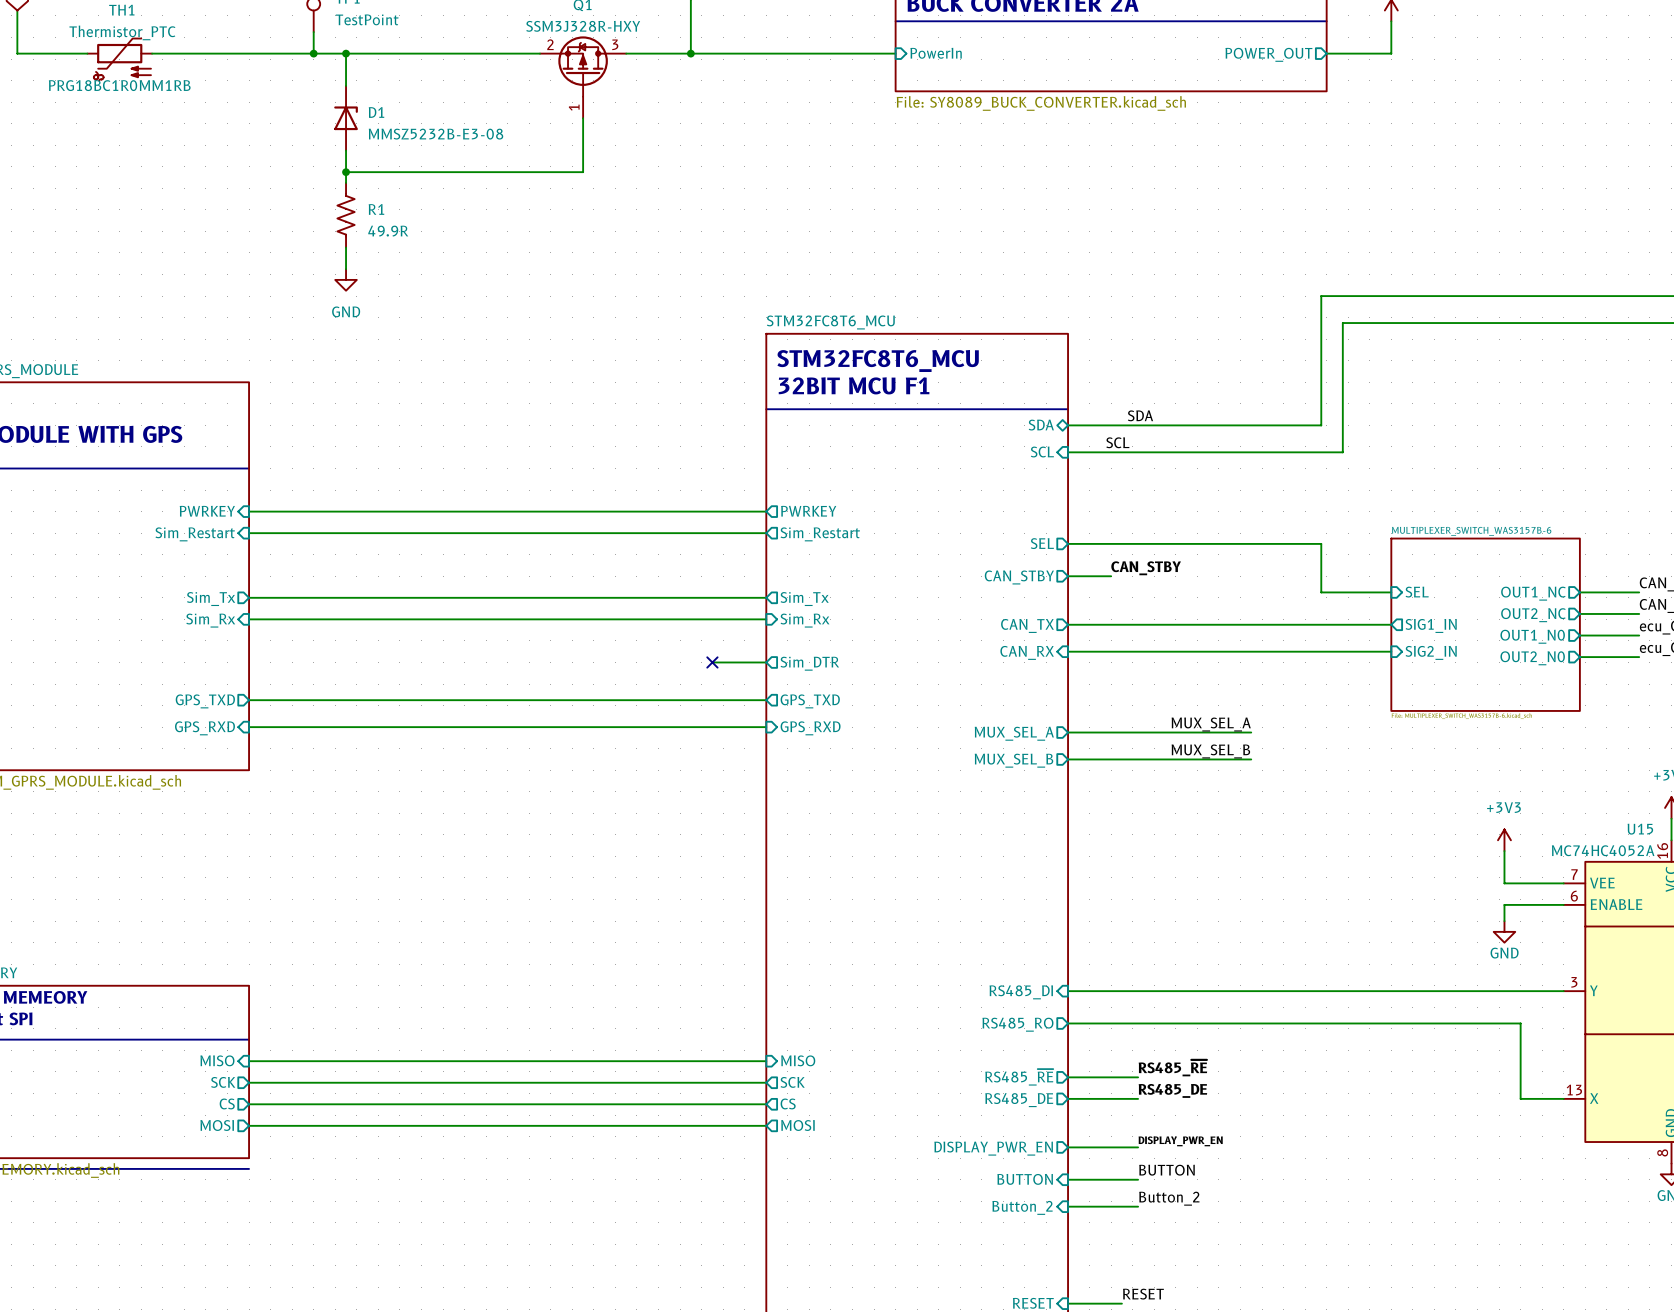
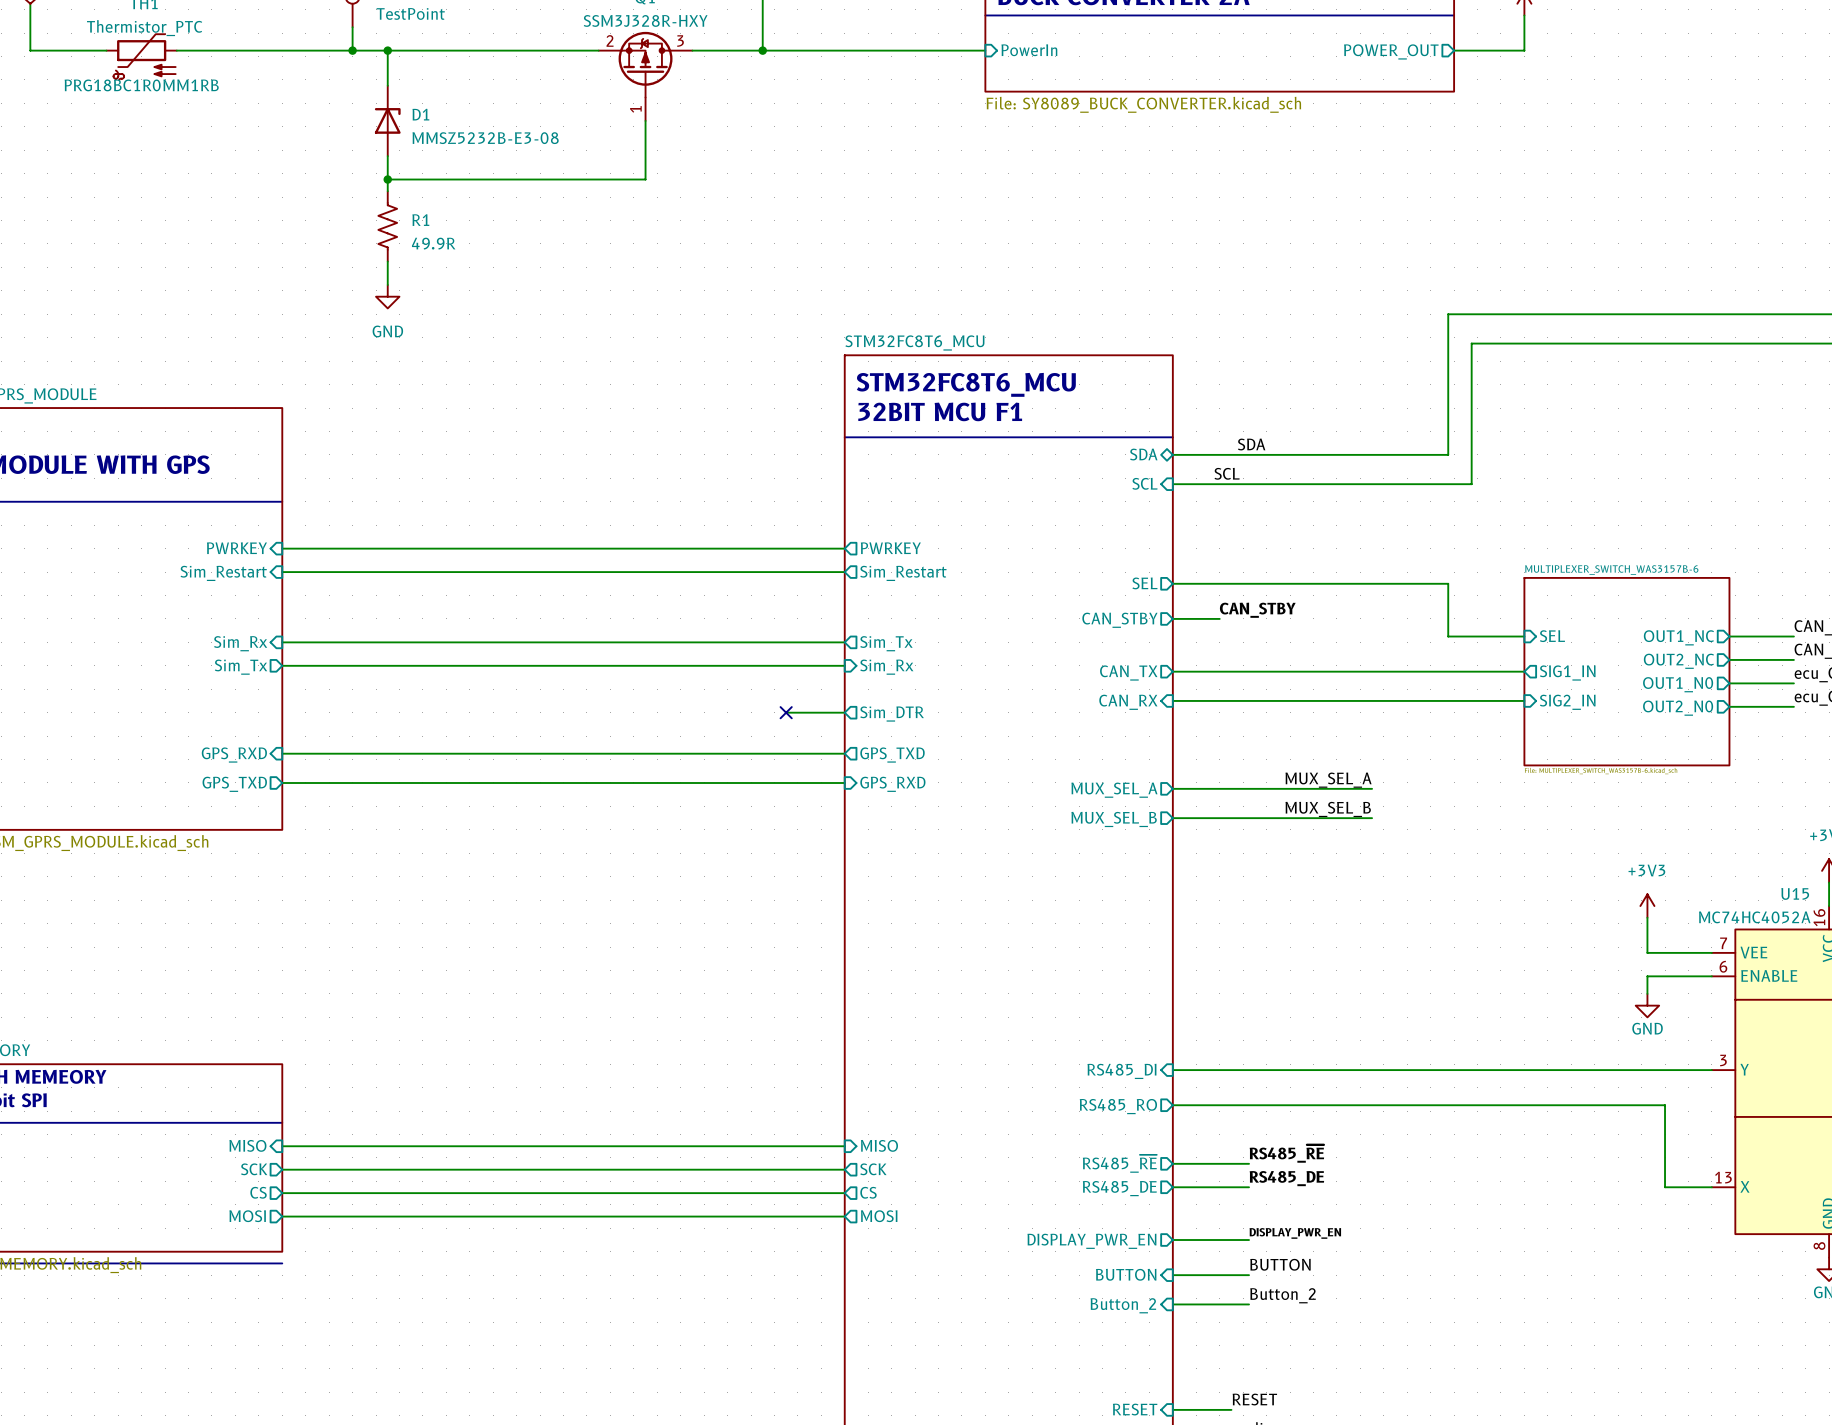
sheet pin shape: output (211, 599) -> input (240, 643)
sheet pin: Sim_Tx (211, 599) -> Sim_Rx (240, 643)
sheet pin shape: input (210, 620) -> output (241, 667)
sheet pin: Sim_Rx (210, 620) -> Sim_Tx (241, 667)
sheet pin shape: output (205, 701) -> input (234, 755)
sheet pin: GPS_TXD (205, 701) -> GPS_RXD (234, 755)
sheet pin shape: input (204, 728) -> output (234, 784)
sheet pin: GPS_RXD (204, 728) -> GPS_TXD (234, 784)

